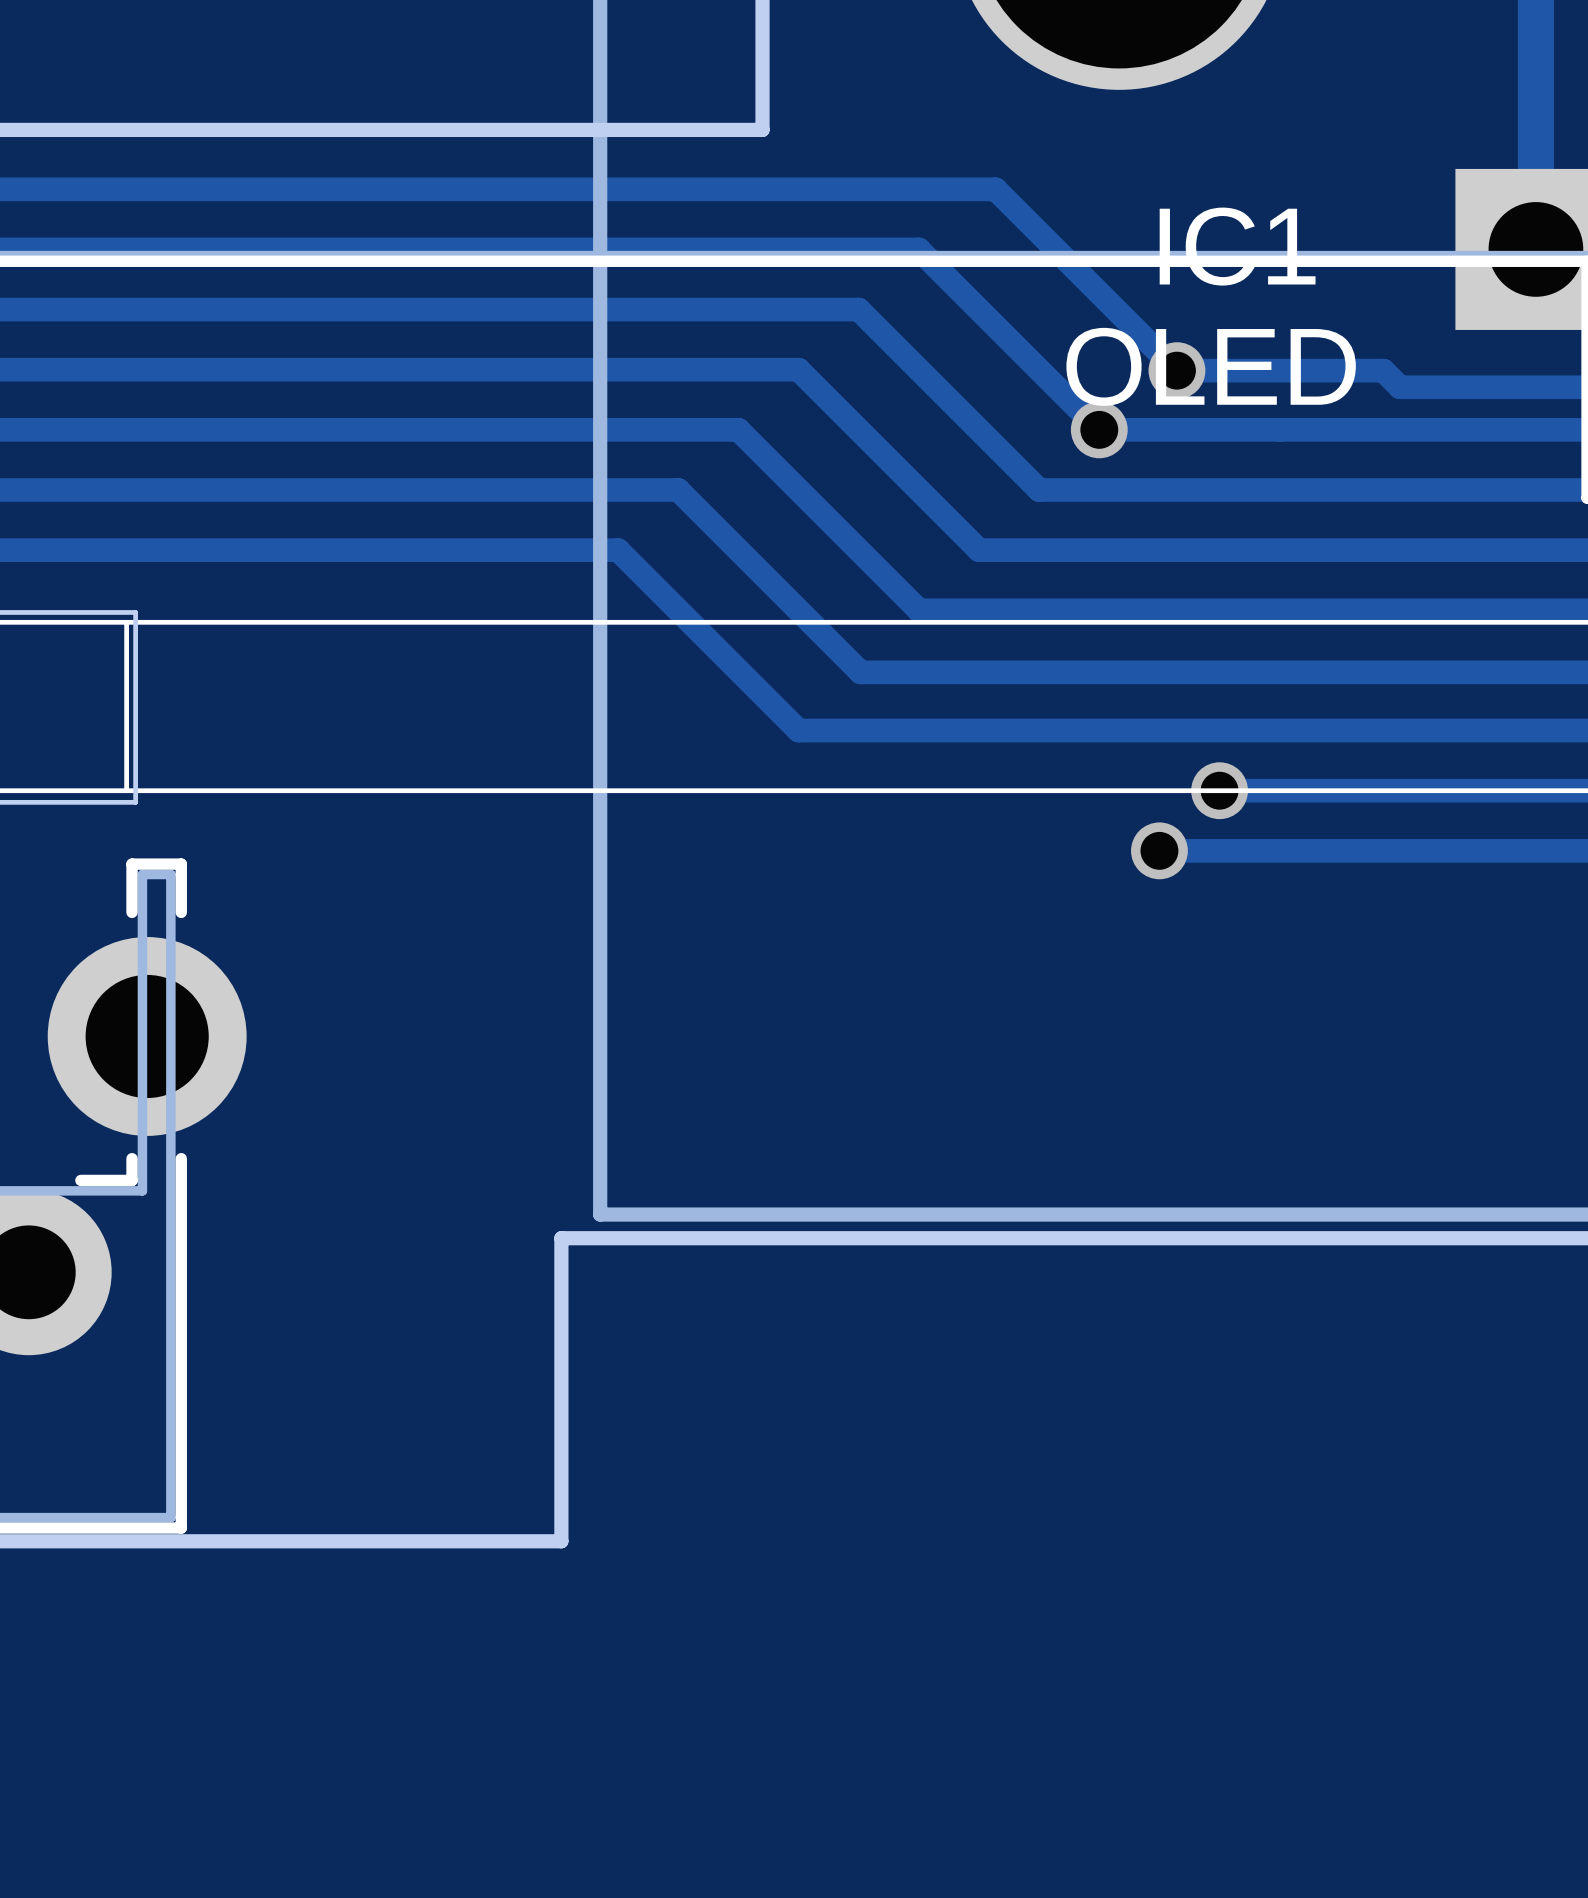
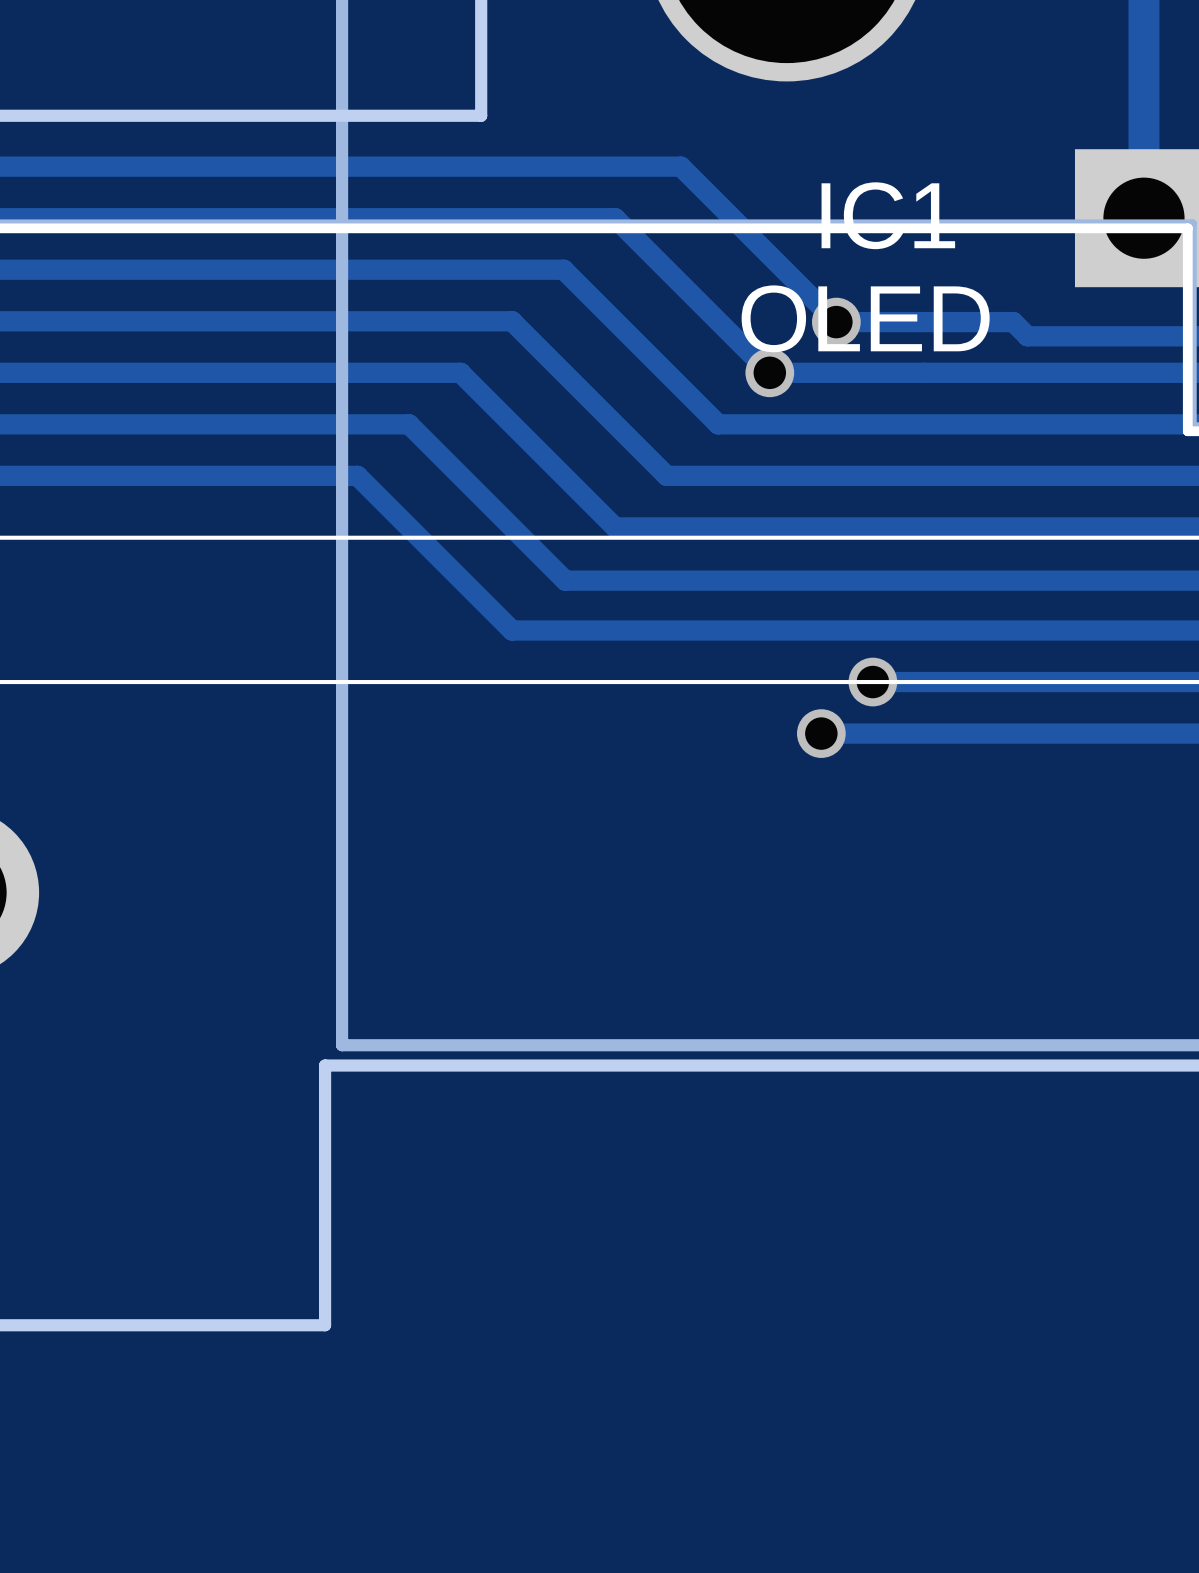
board edge: (580, 1238) (561, 1238) (561, 1541) -> (325, 1065) (325, 1325) (308, 1325)

